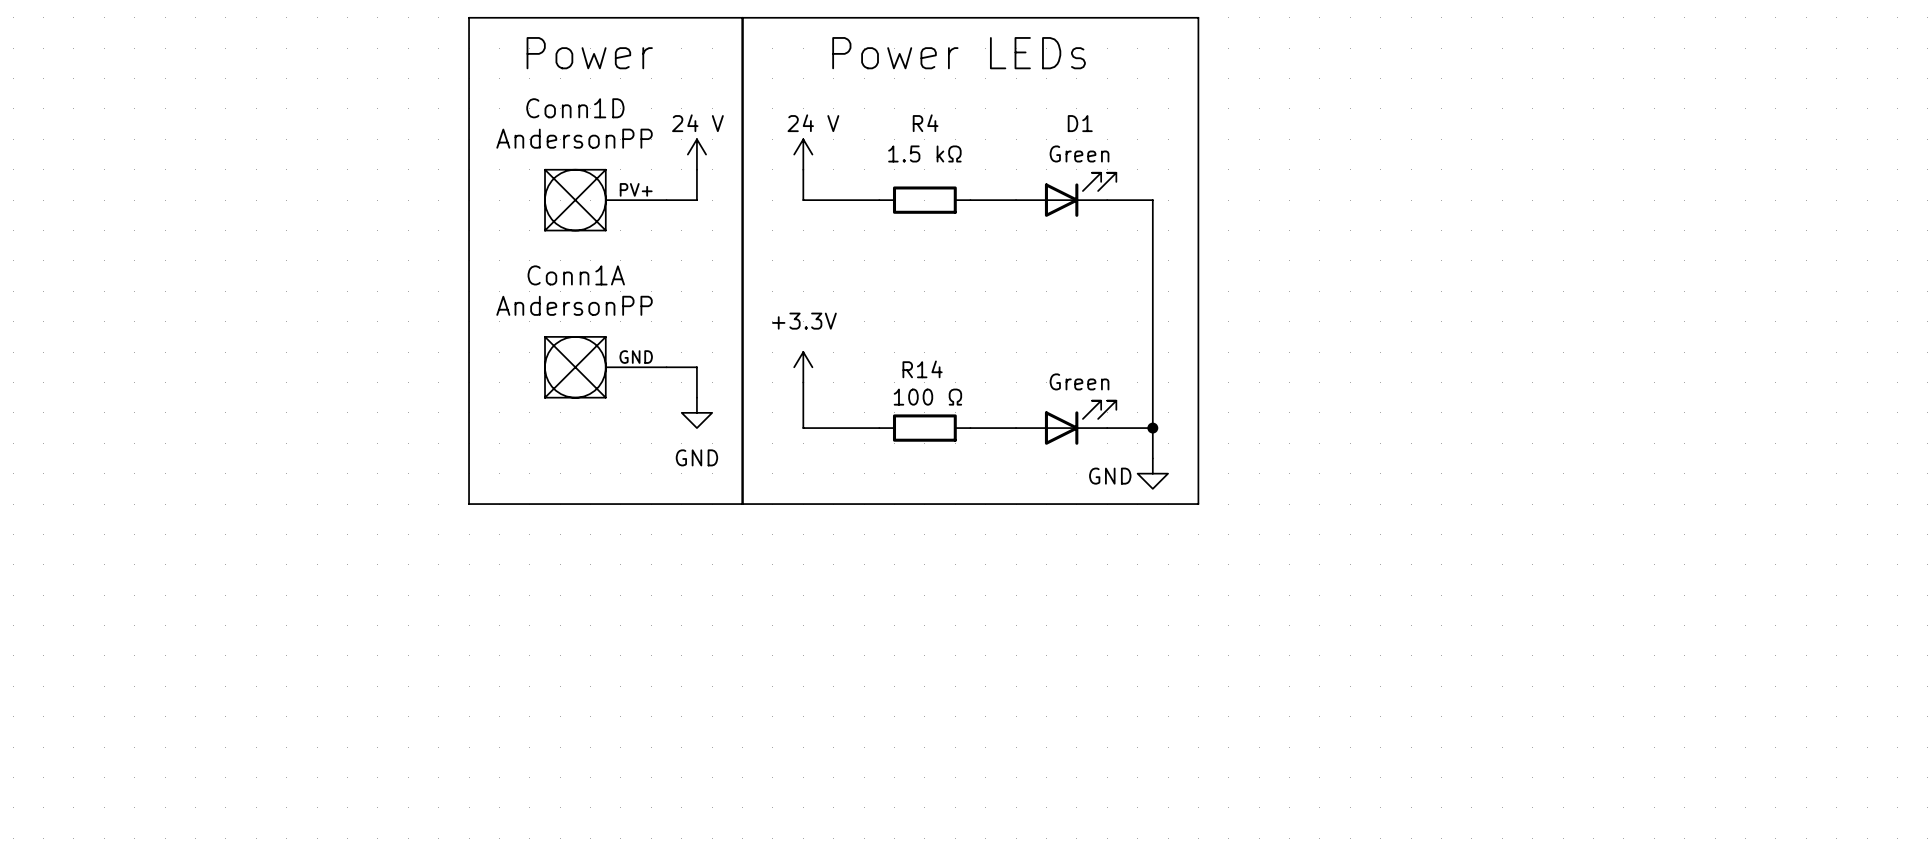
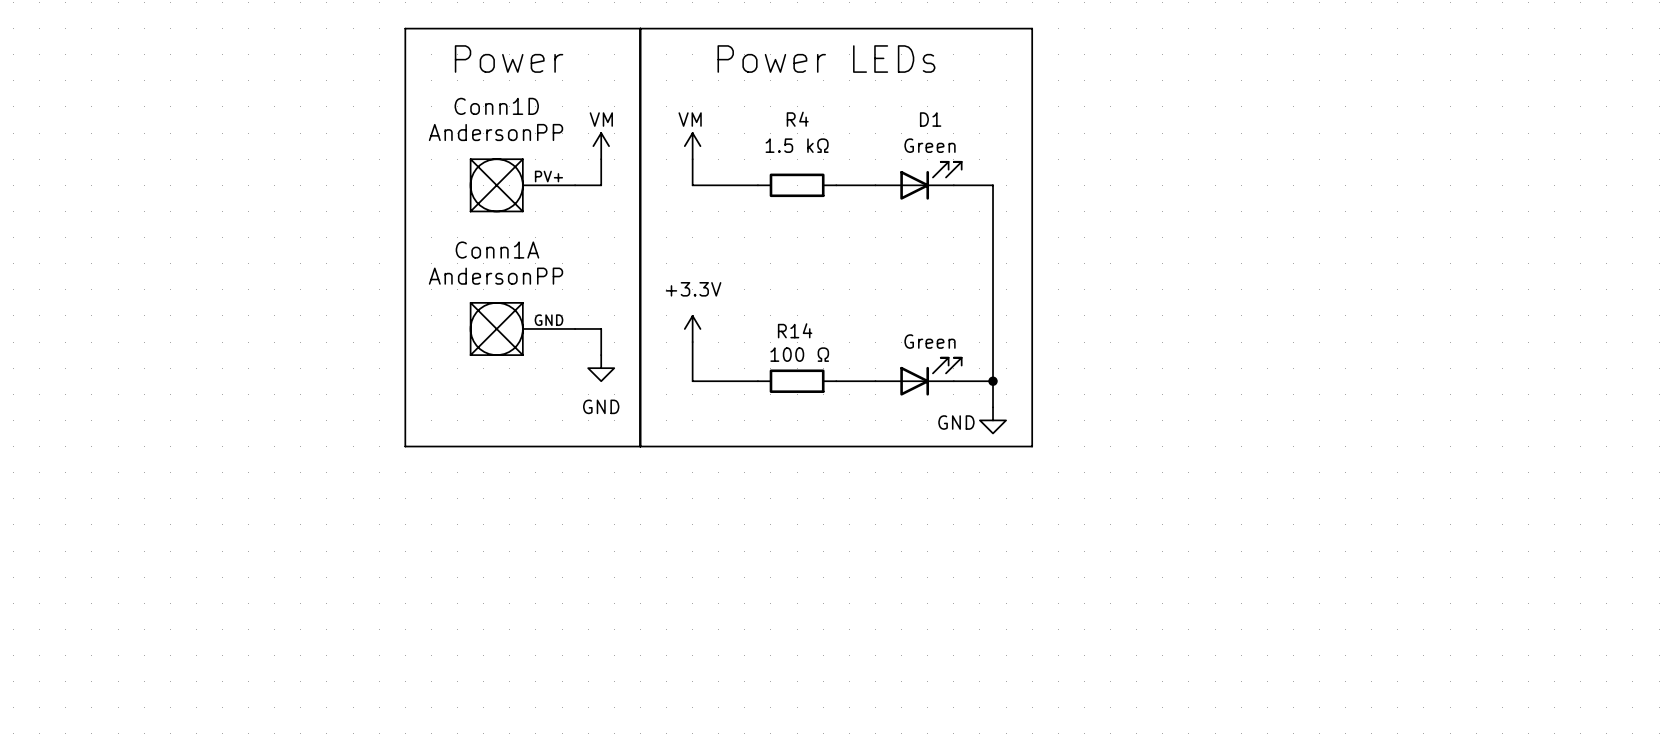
power symbol: 24 V (696, 154) -> VM (601, 146)
power symbol: 24 V (803, 154) -> VM (692, 146)

